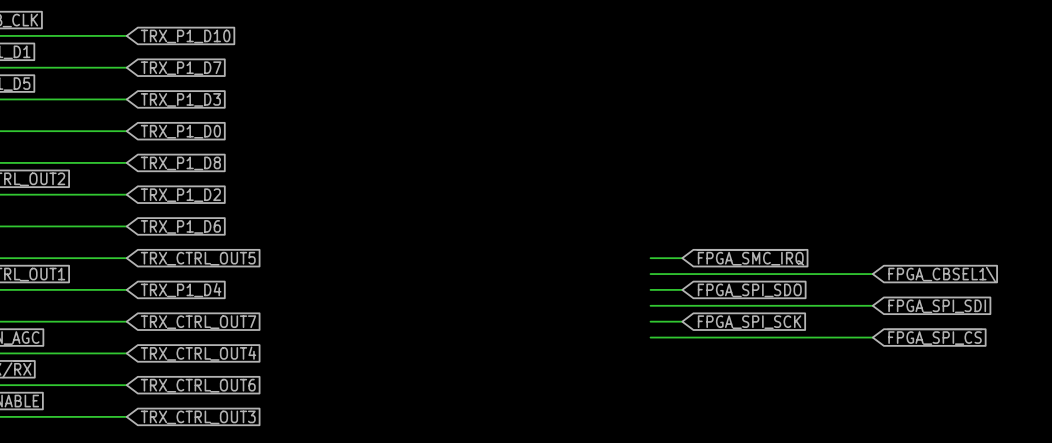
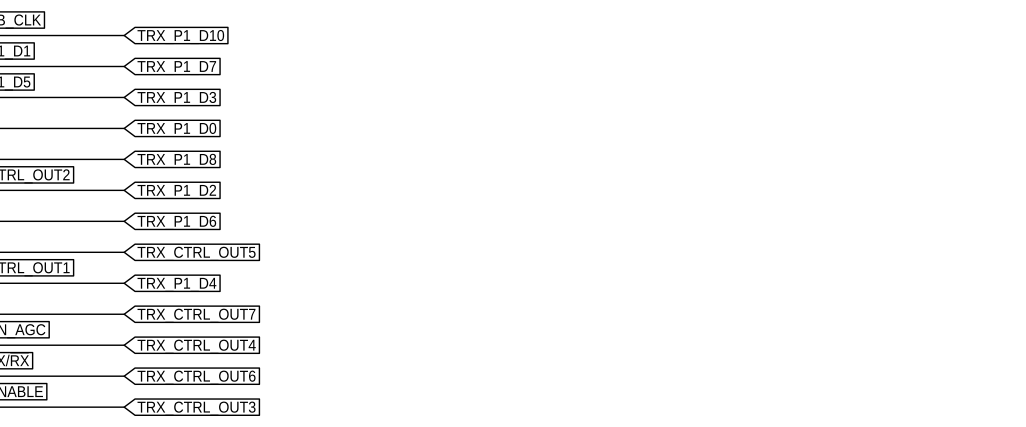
global label: ~{FPGA_SMC_IRQ} (750, 257) -> none
wire: (650, 258) (682, 258) -> none
wire: (650, 274) (872, 274) -> none
global label: FPGA_CBSEL1\ (942, 274) -> none
wire: (650, 289) (682, 289) -> none
global label: FPGA_SPI_SDO (749, 290) -> none
wire: (650, 305) (872, 305) -> none
global label: FPGA_SPI_SDI (937, 306) -> none
wire: (650, 321) (682, 321) -> none
global label: FPGA_SPI_SCK (749, 322) -> none
global label: ~{FPGA_SPI_CS} (934, 336) -> none
wire: (650, 337) (872, 337) -> none

